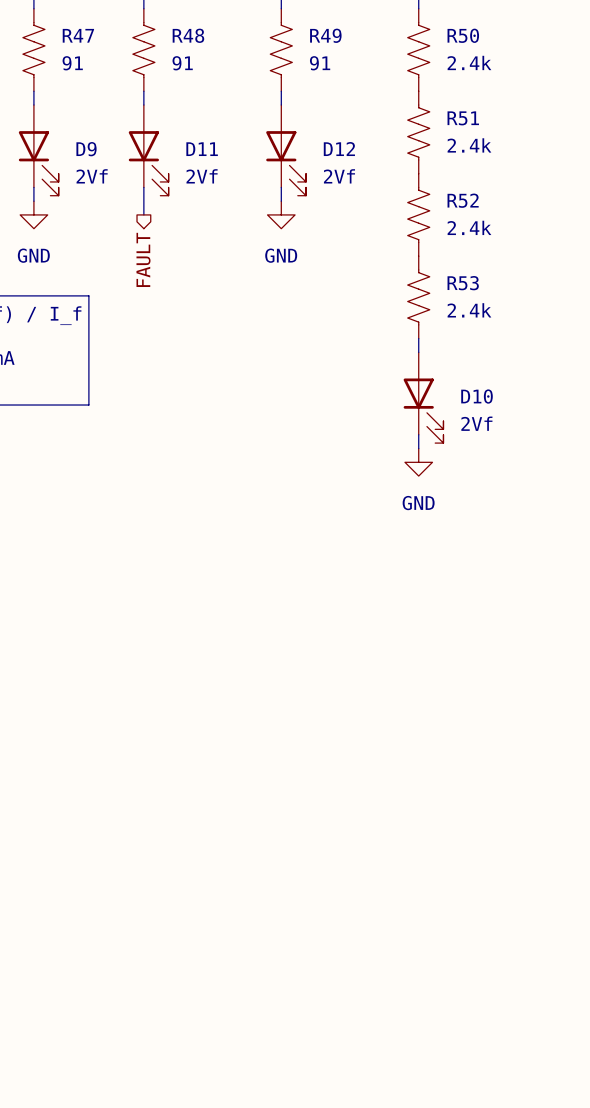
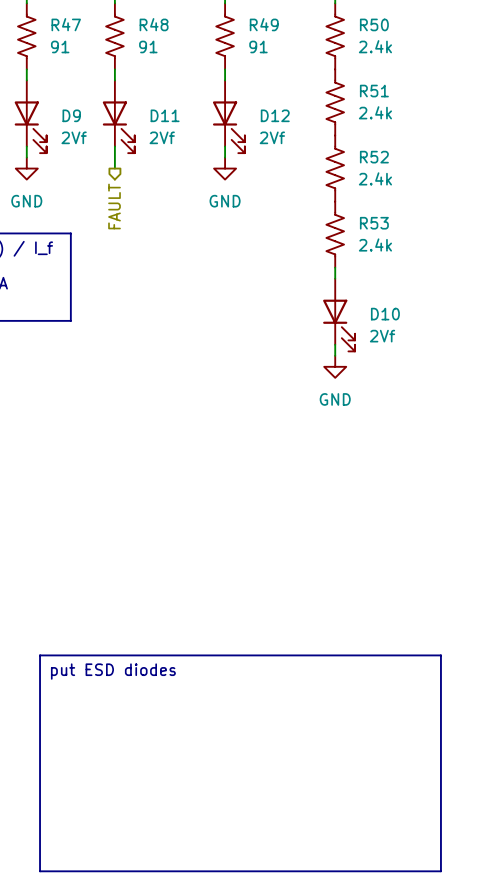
line: none -> (40, 655) (440, 655) (440, 871) (40, 871) (40, 655)
text: none -> put ESD diodes (113, 671)

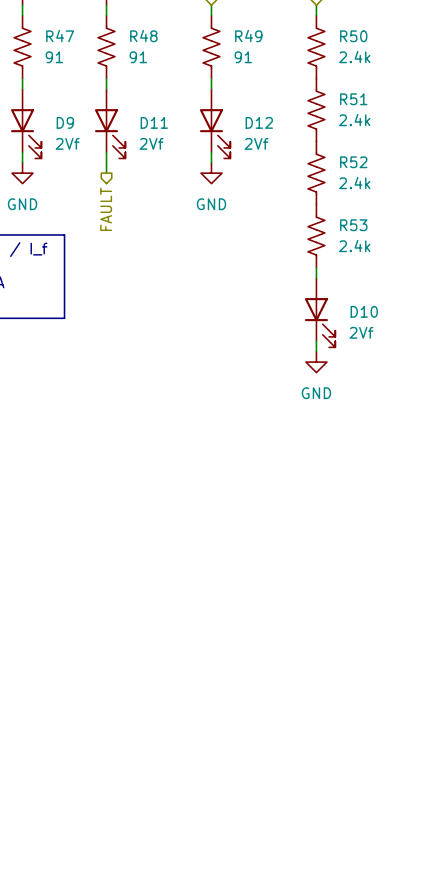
line: (40, 655) (440, 655) (440, 871) (40, 871) (40, 655) -> none
text: put ESD diodes (113, 671) -> none

